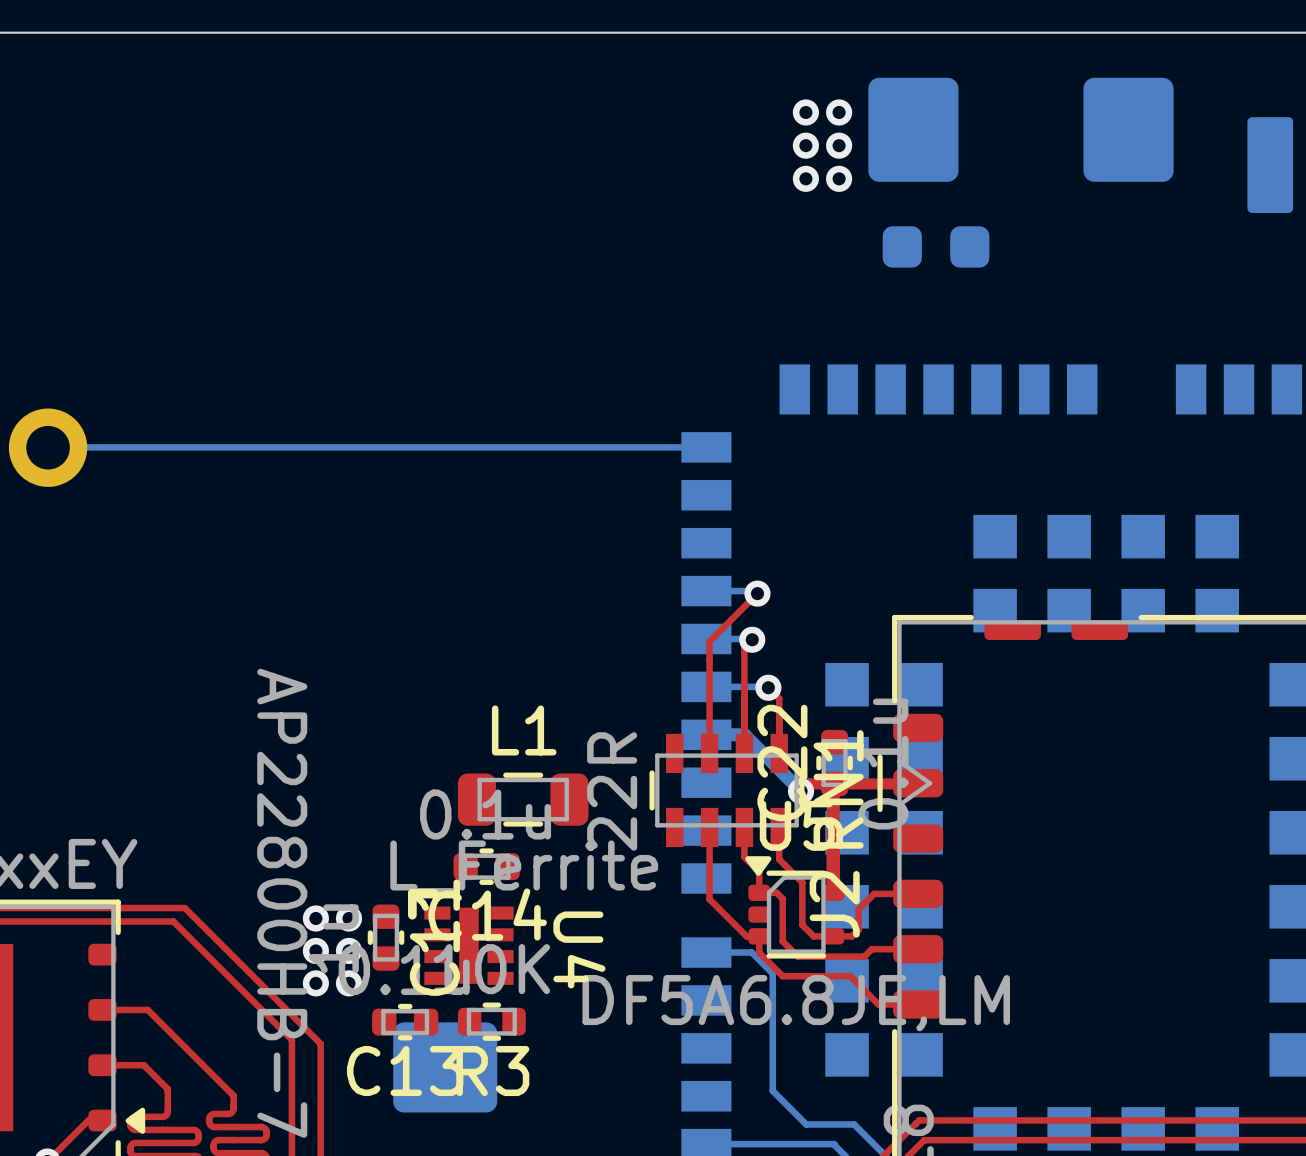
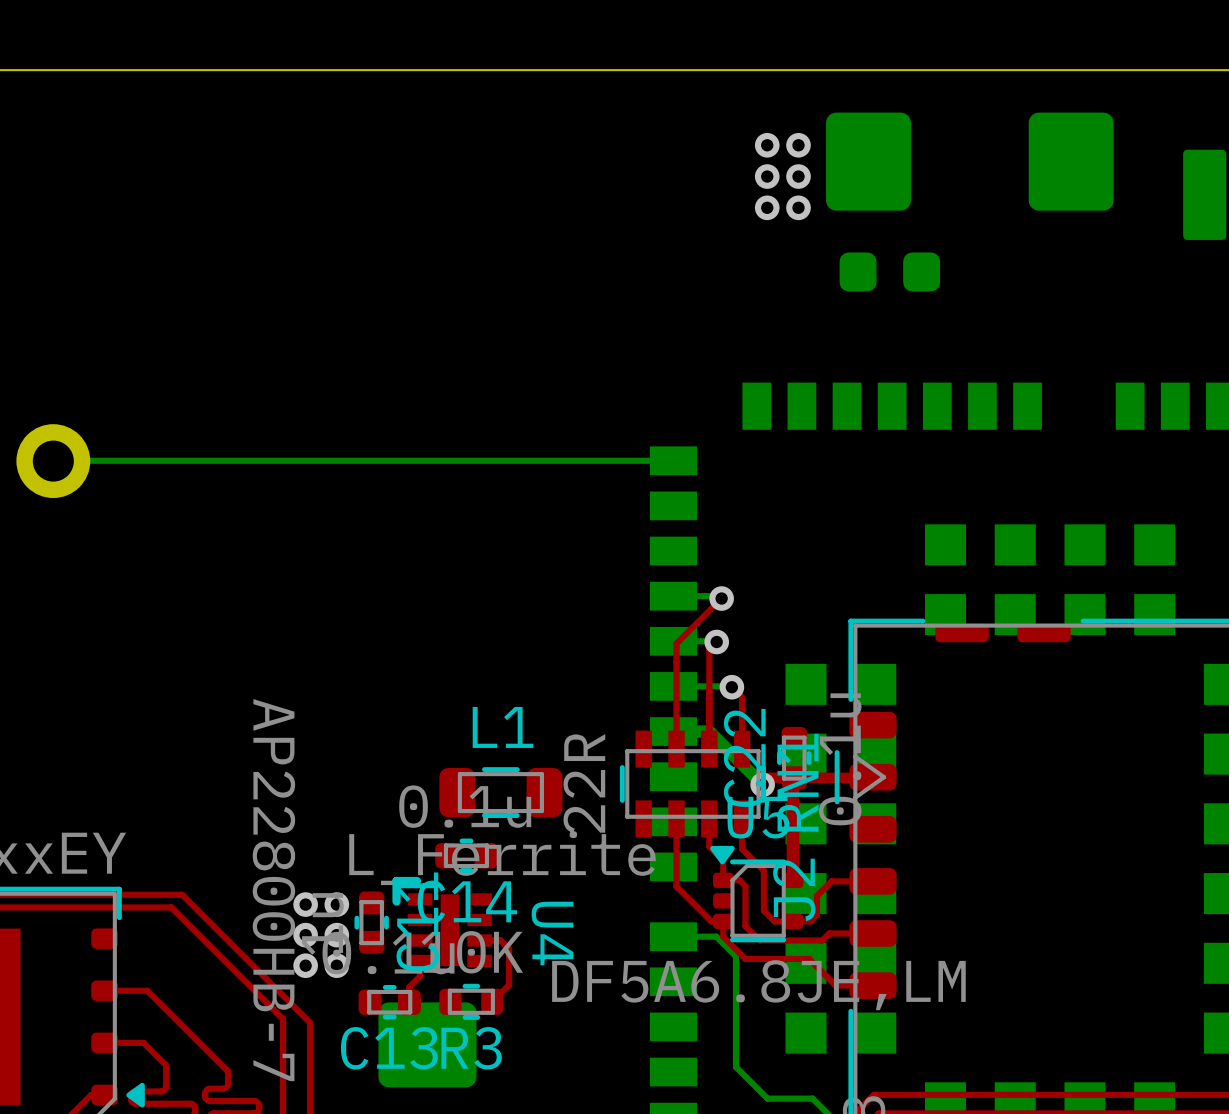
top track: none -> (479, 940) (500, 940) (509, 948) (509, 984) (492, 1001)
top track: none -> (420, 960) (420, 976) (409, 987) (409, 1002)

